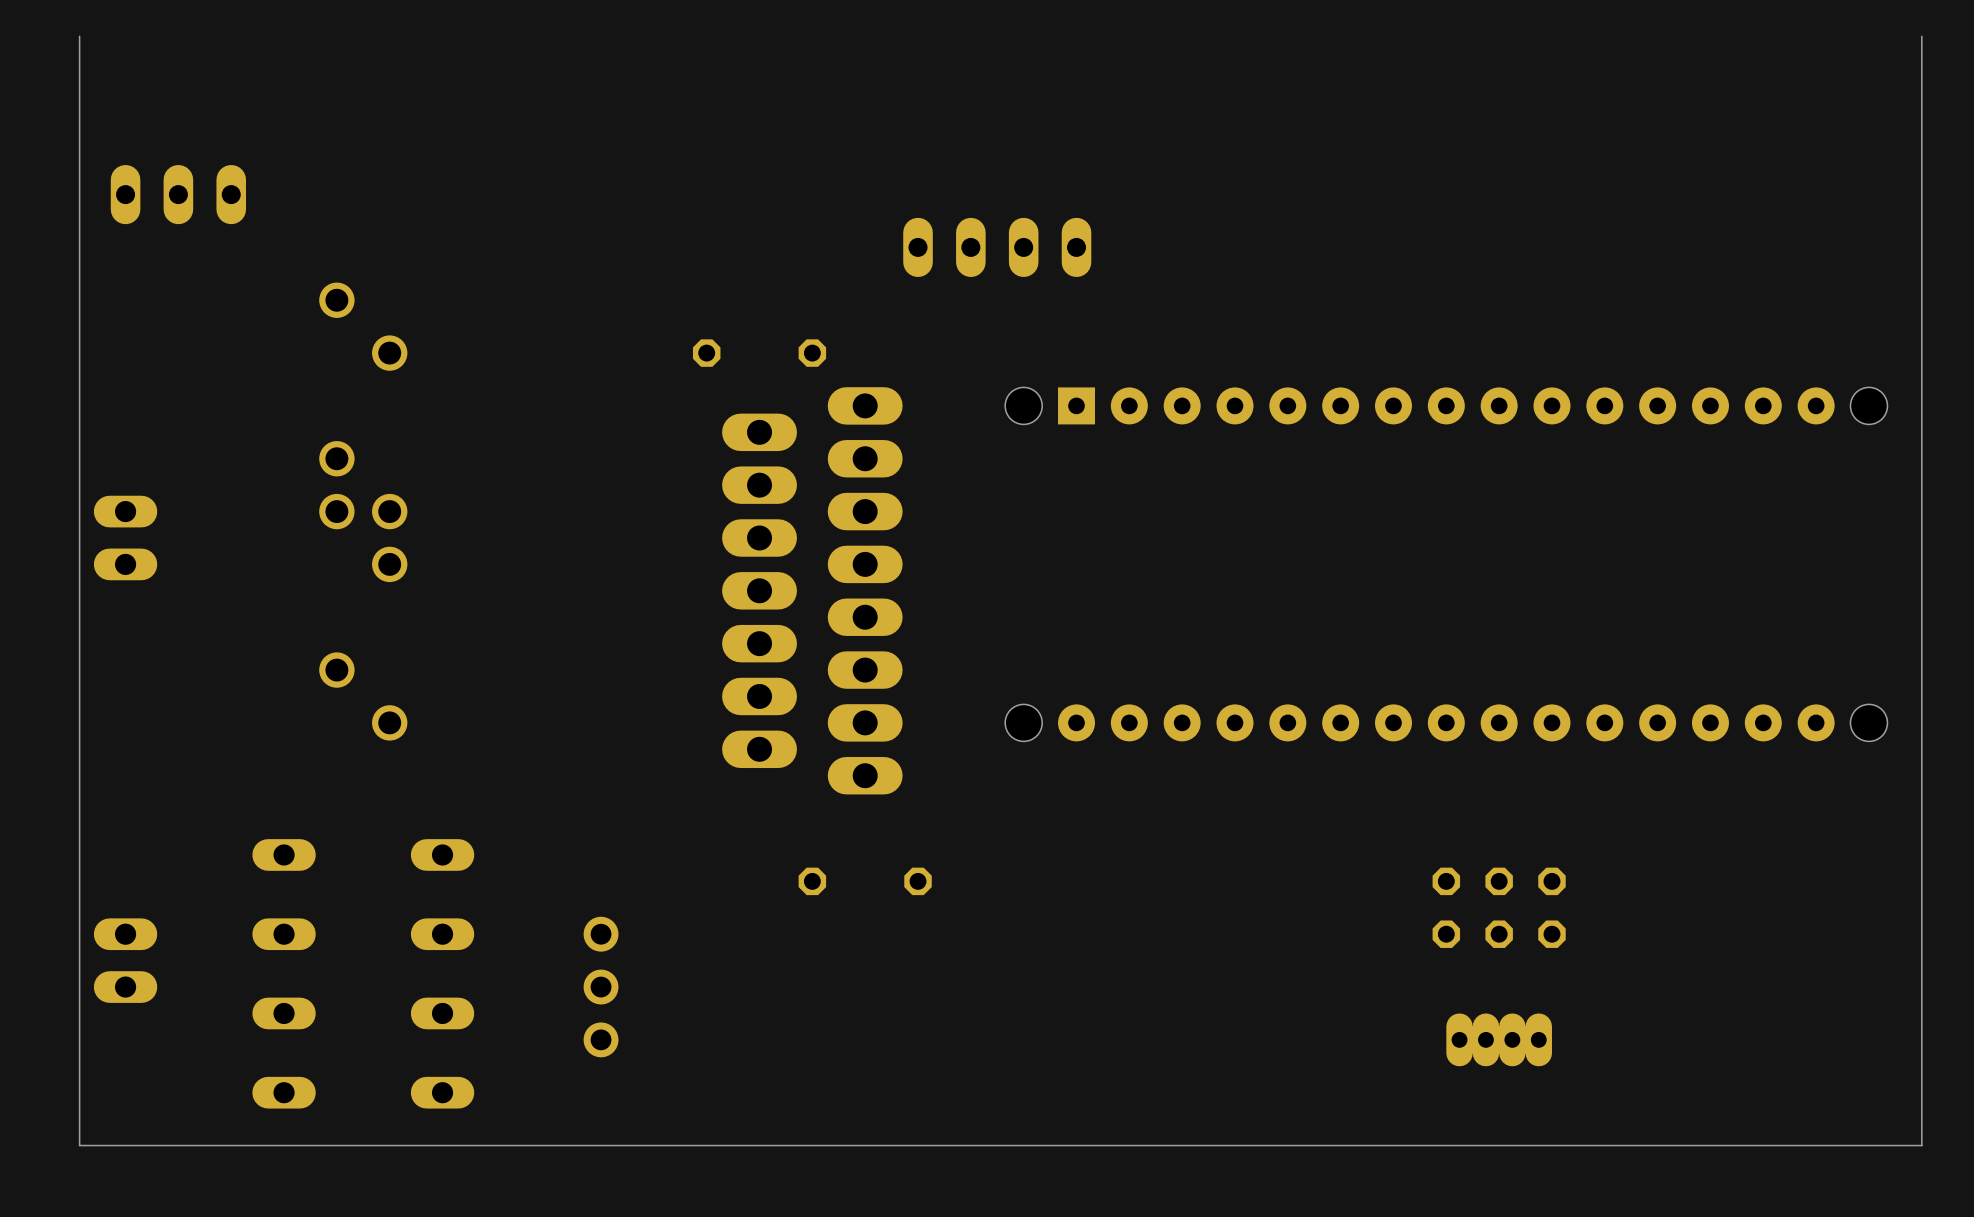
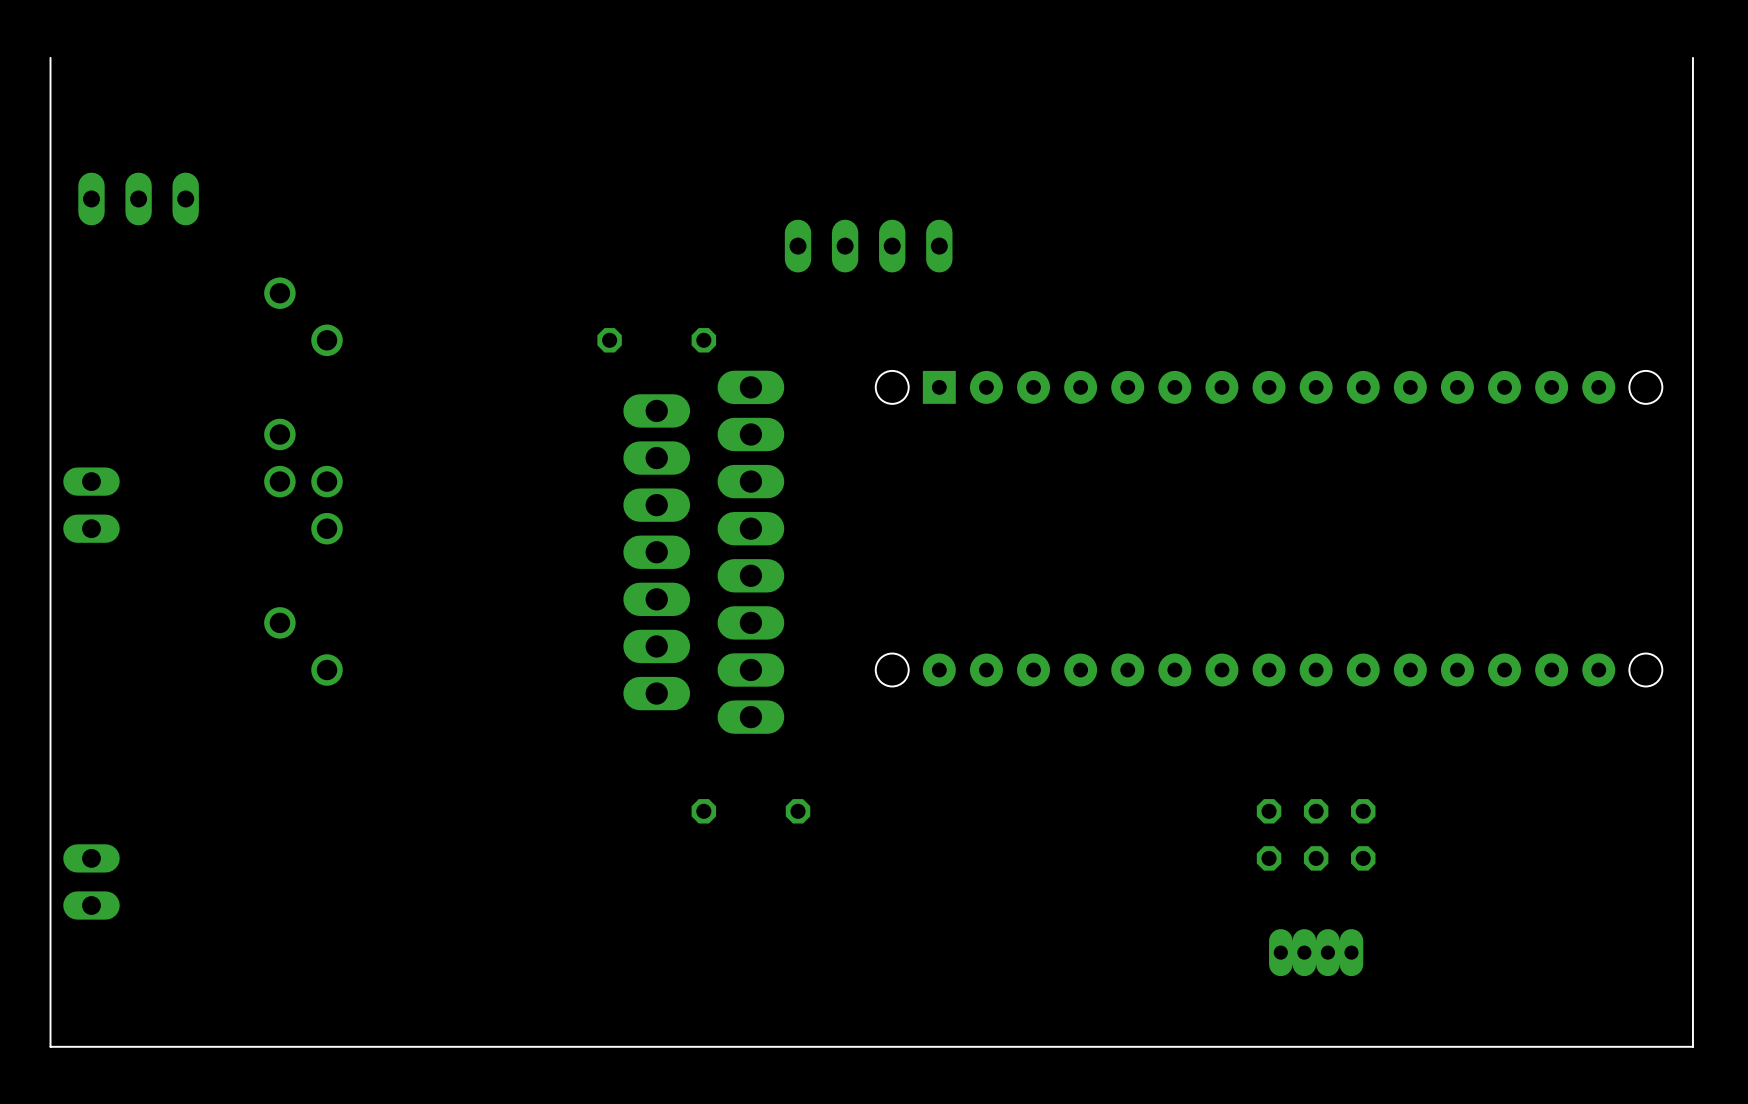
part: (284, 973) -> none
part: (442, 973) -> none
part: (601, 987) -> none

